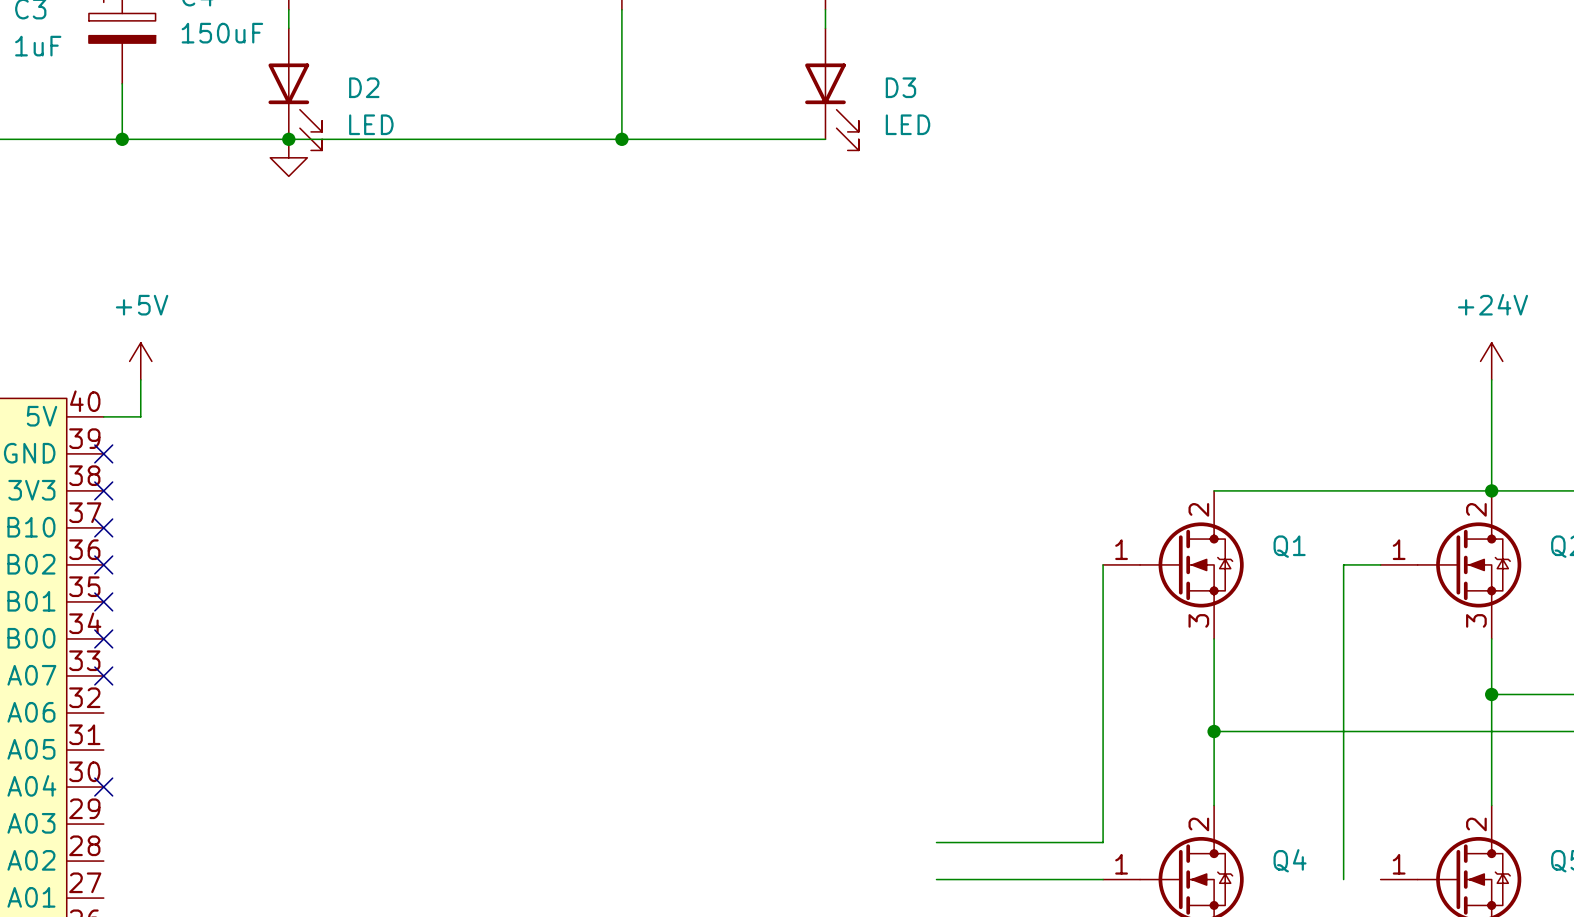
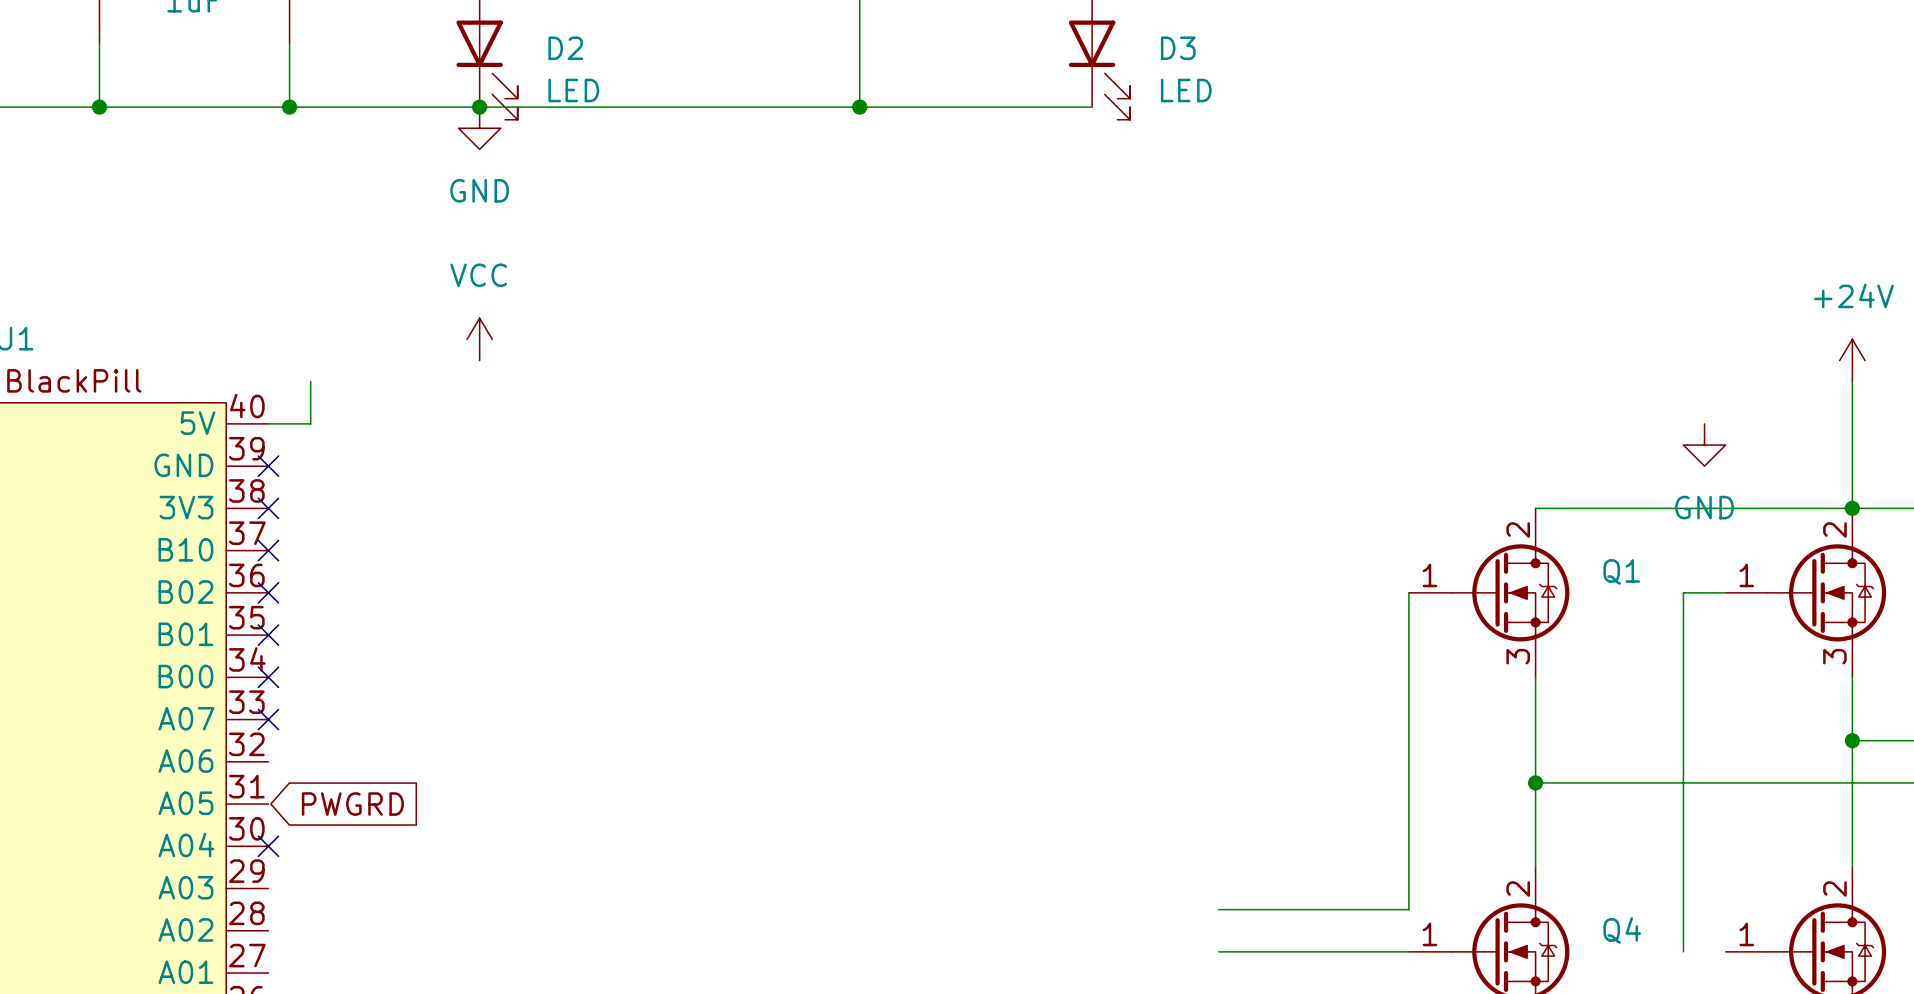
power symbol text: none -> GND (479, 190)
power symbol: none -> VCC (479, 339)
power symbol: +5V (140, 361) -> none
power symbol: none -> GND (1704, 445)
global label: none -> PWGRD (352, 804)

